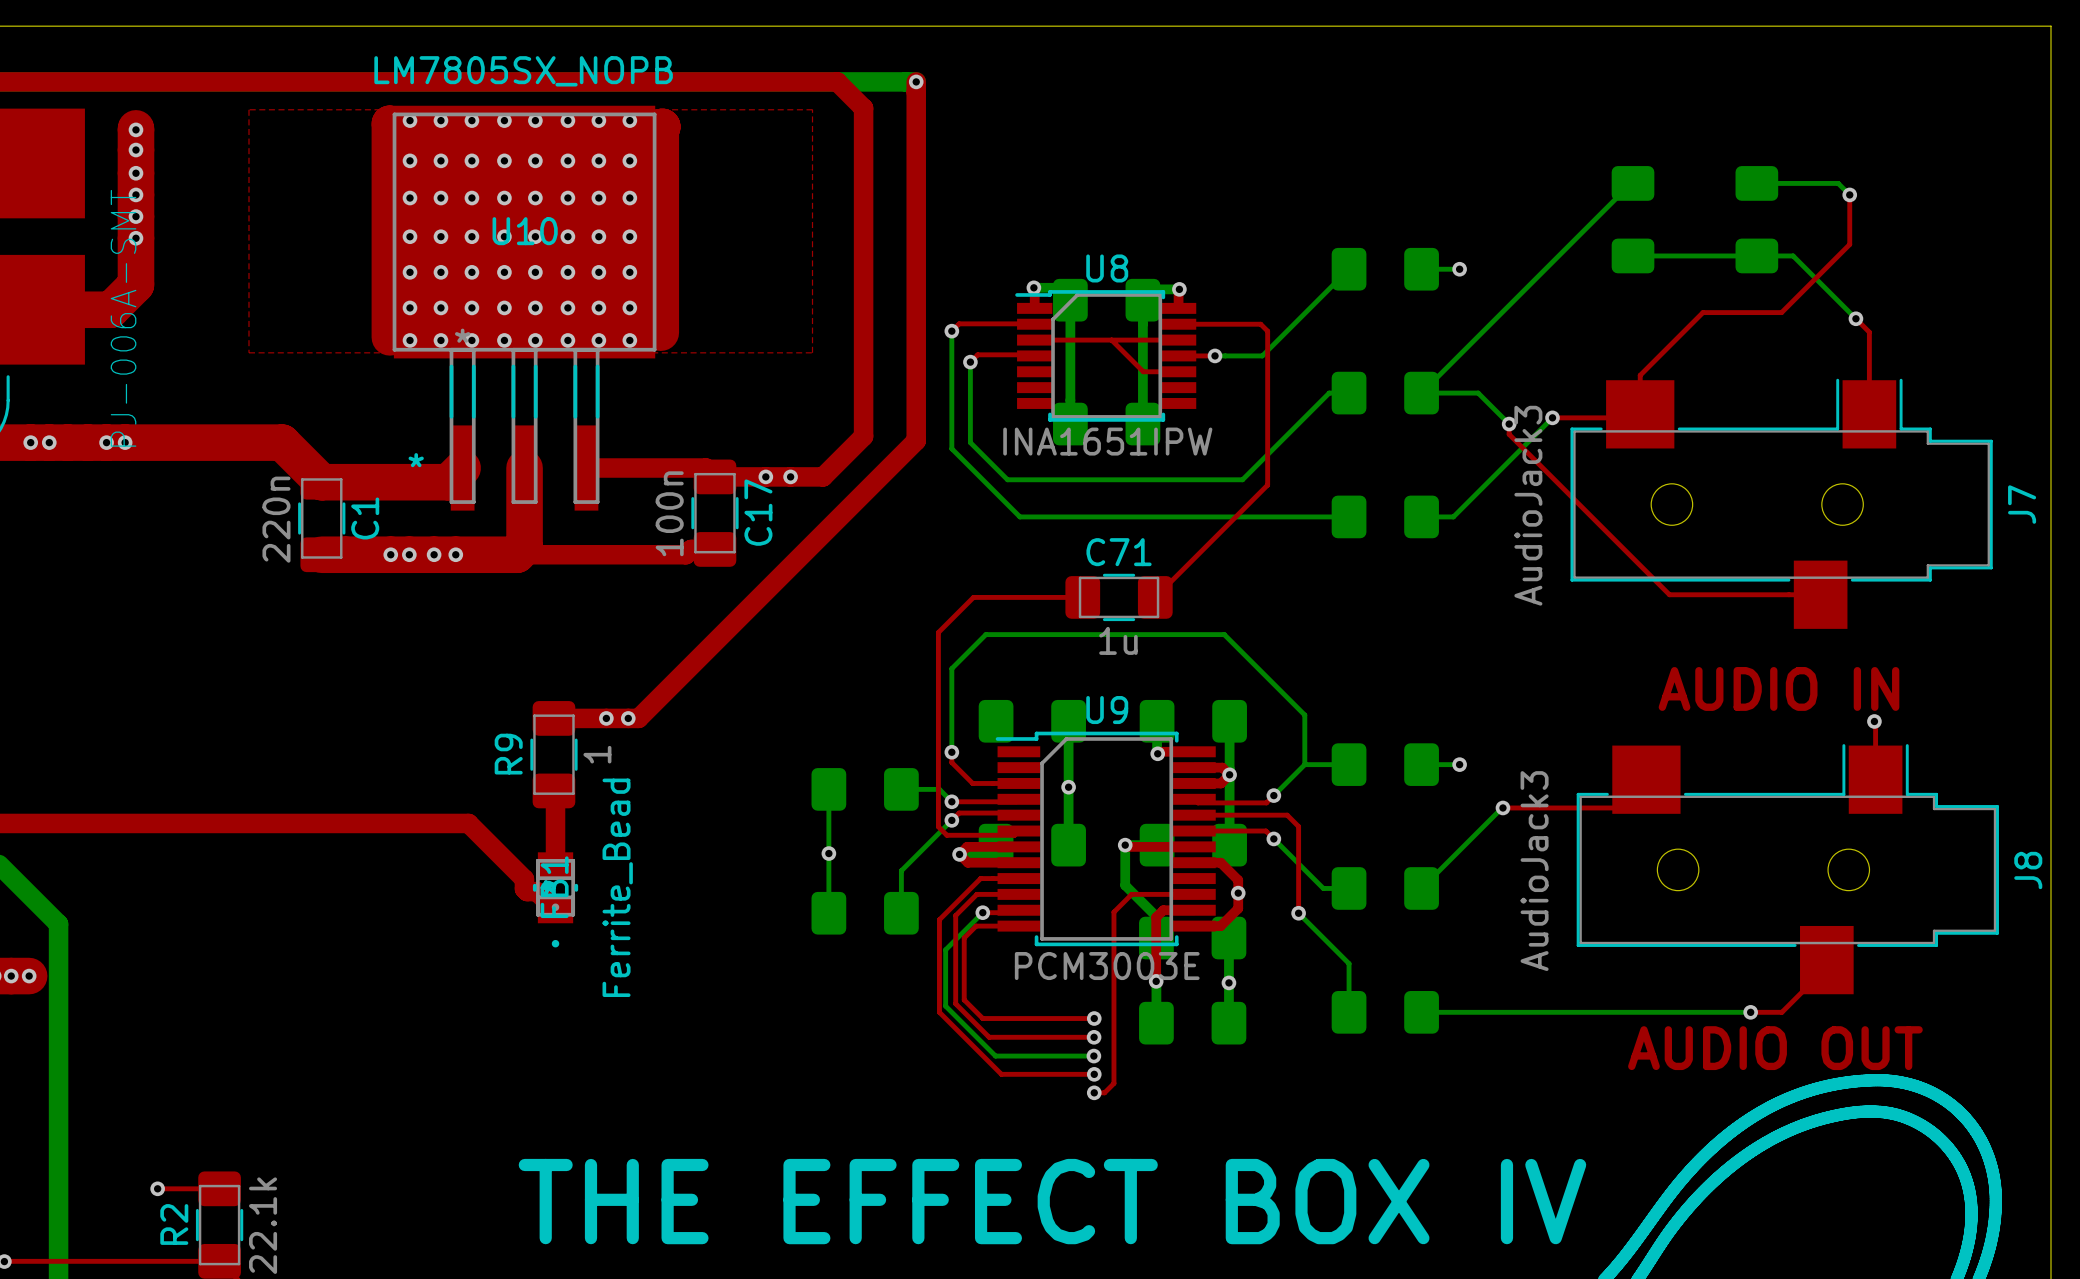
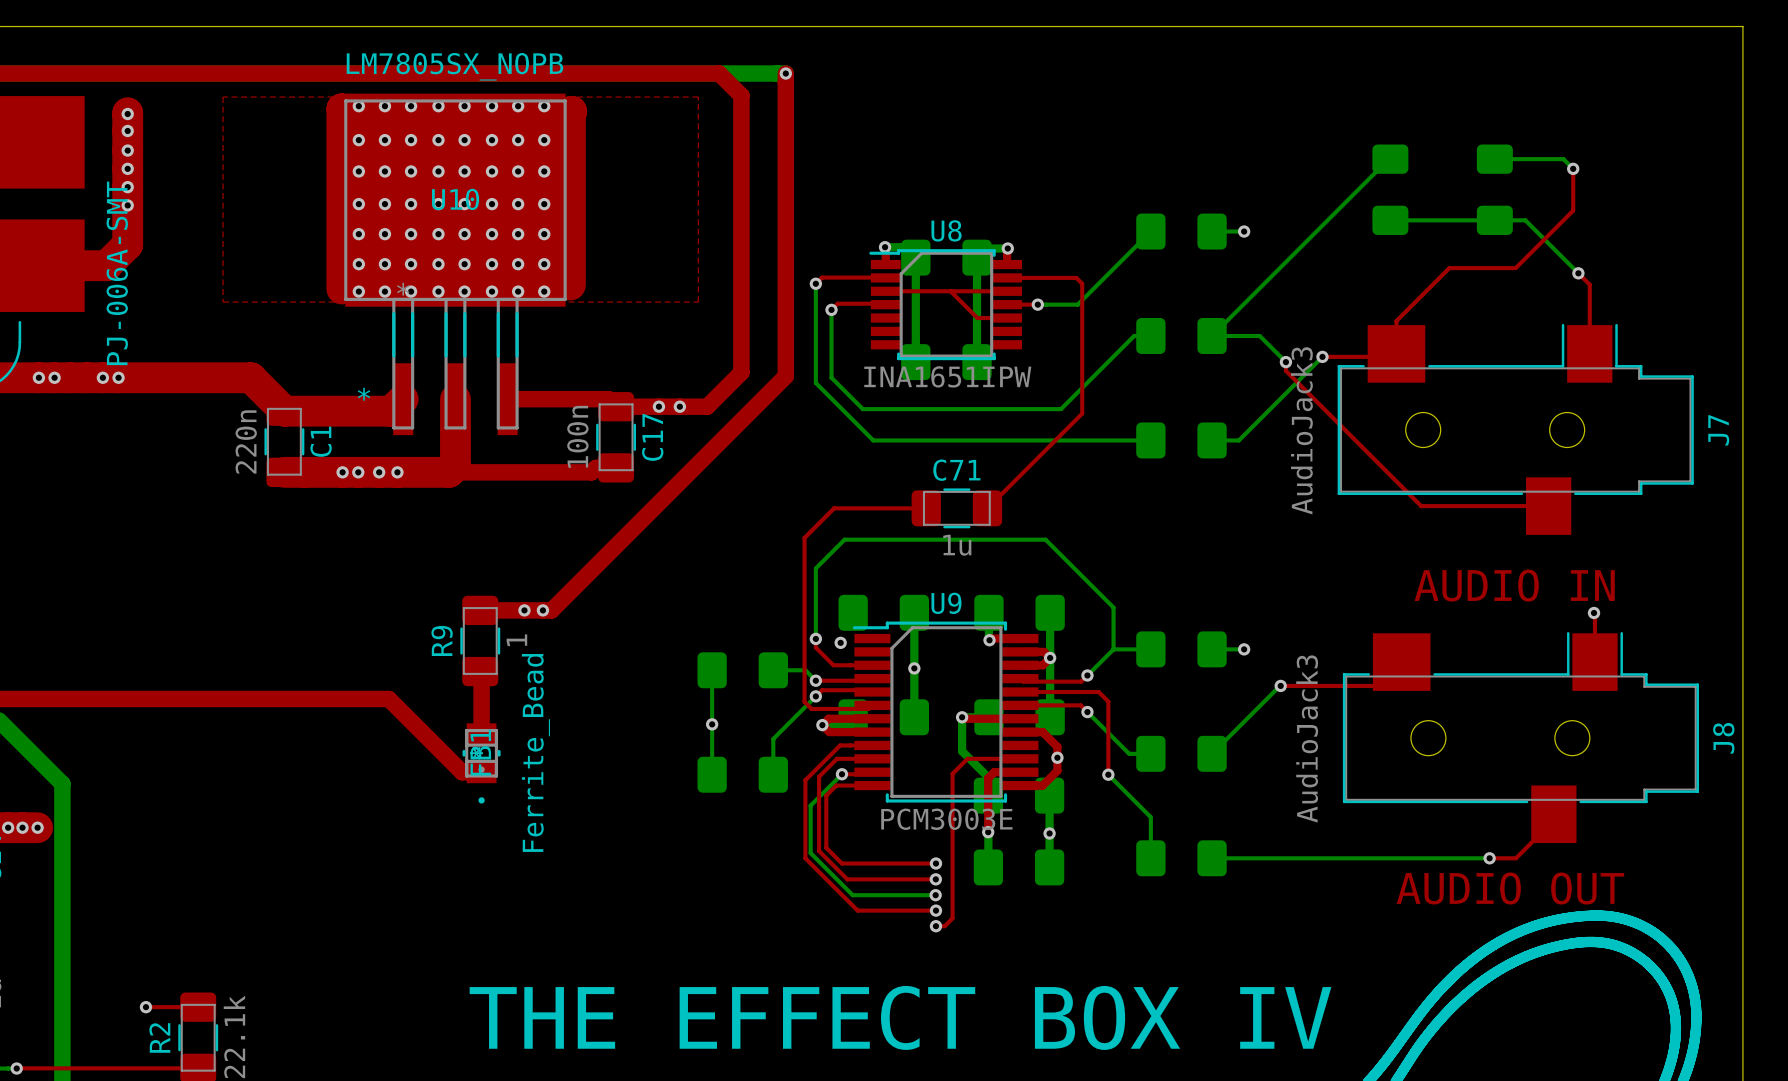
via: none -> (840, 642)
top track: (445, 823) (468, 823) (524, 879) (524, 888) (527, 891) (536, 891) (555, 910) -> (388, 698) (462, 772) (481, 772)

